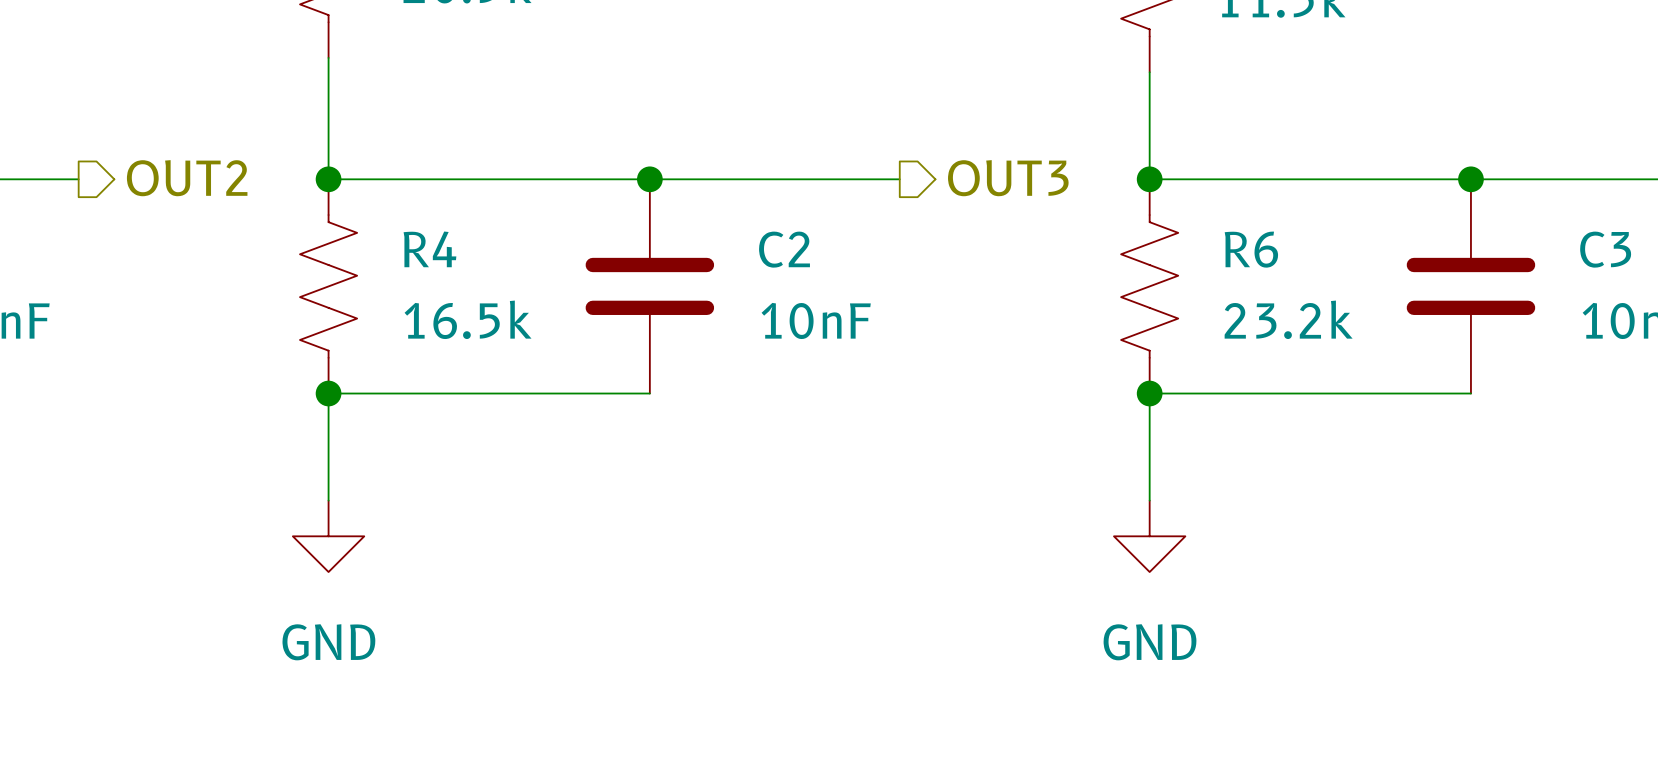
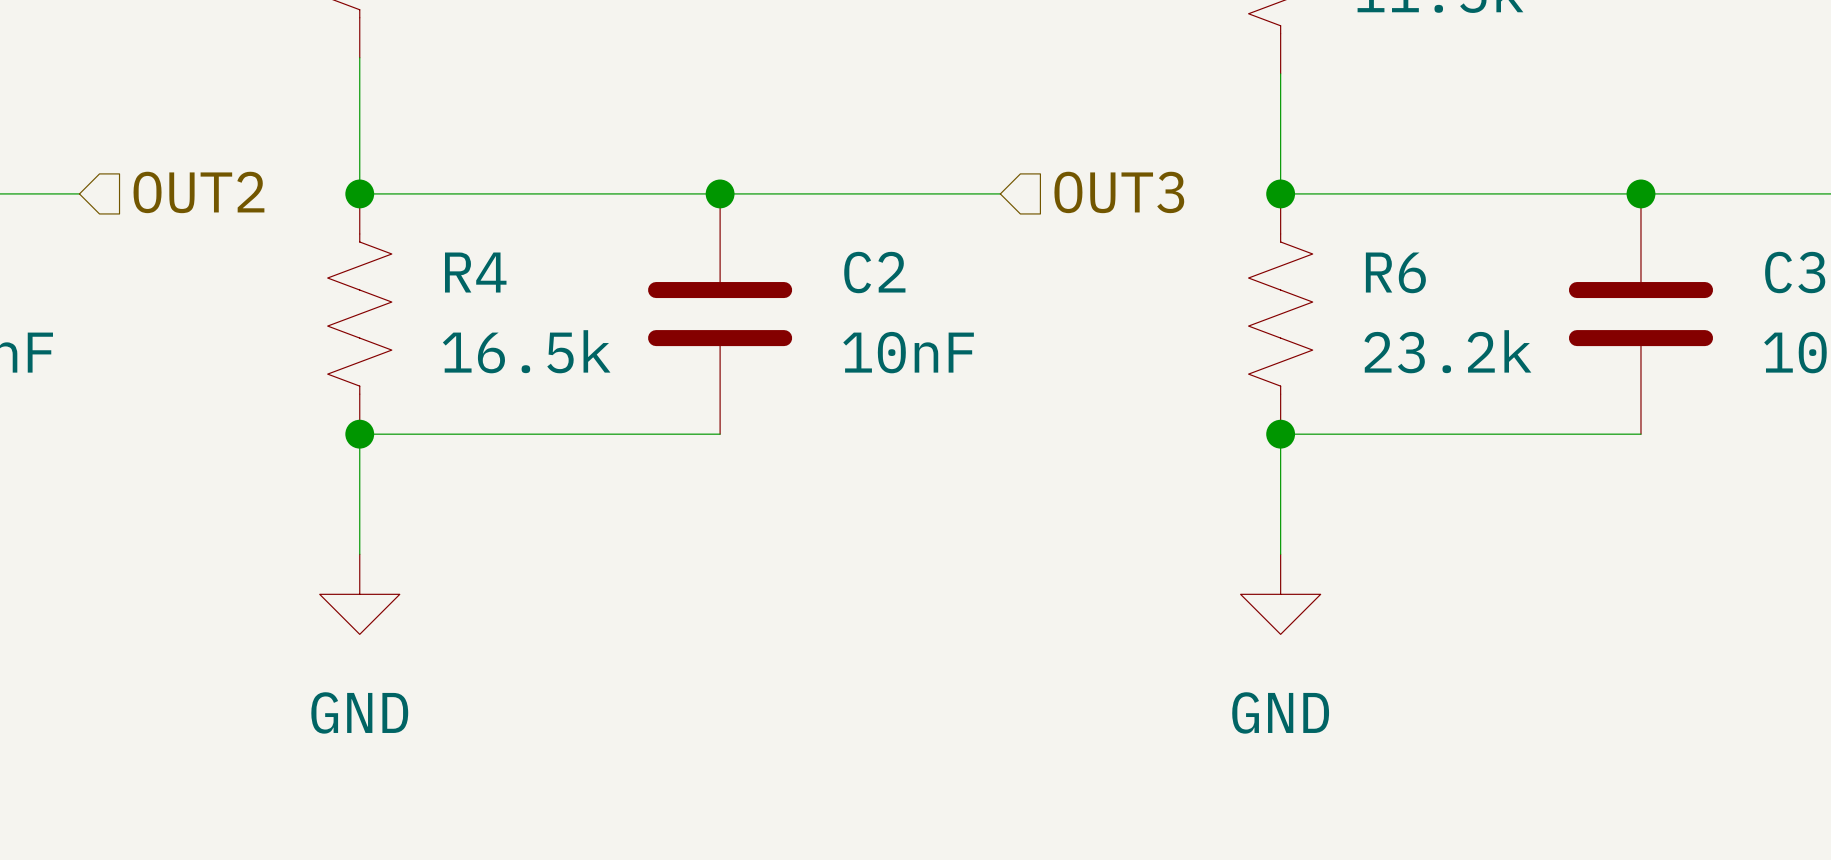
hierarchical label shape: output (187, 178) -> input (198, 192)
hierarchical label shape: output (1008, 178) -> input (1119, 192)

